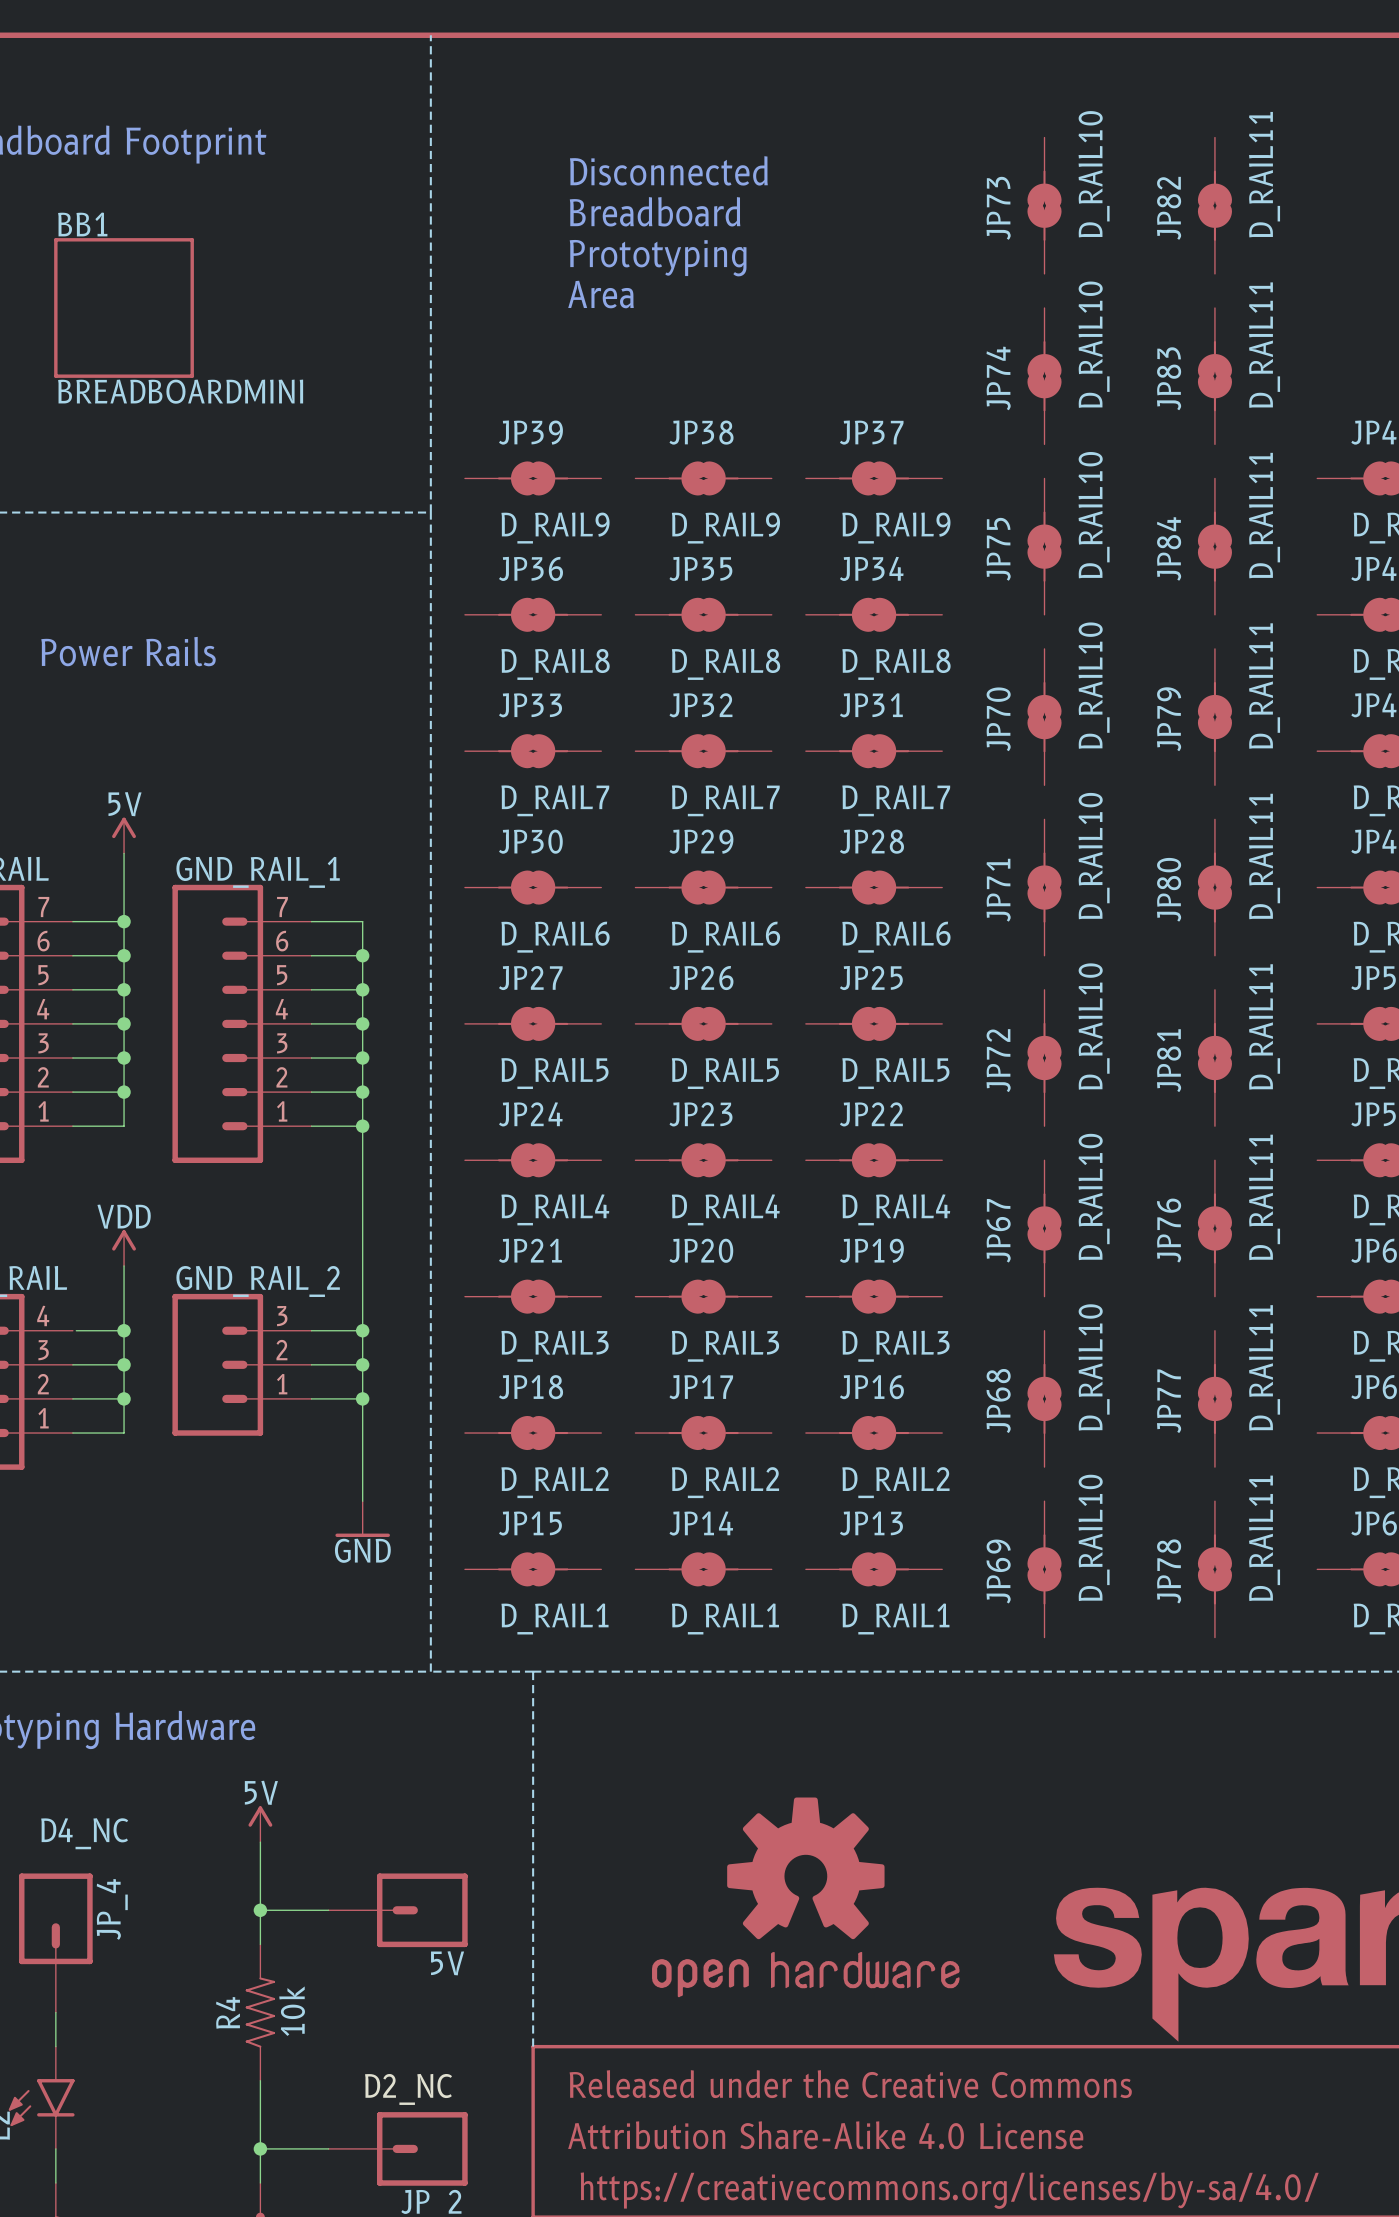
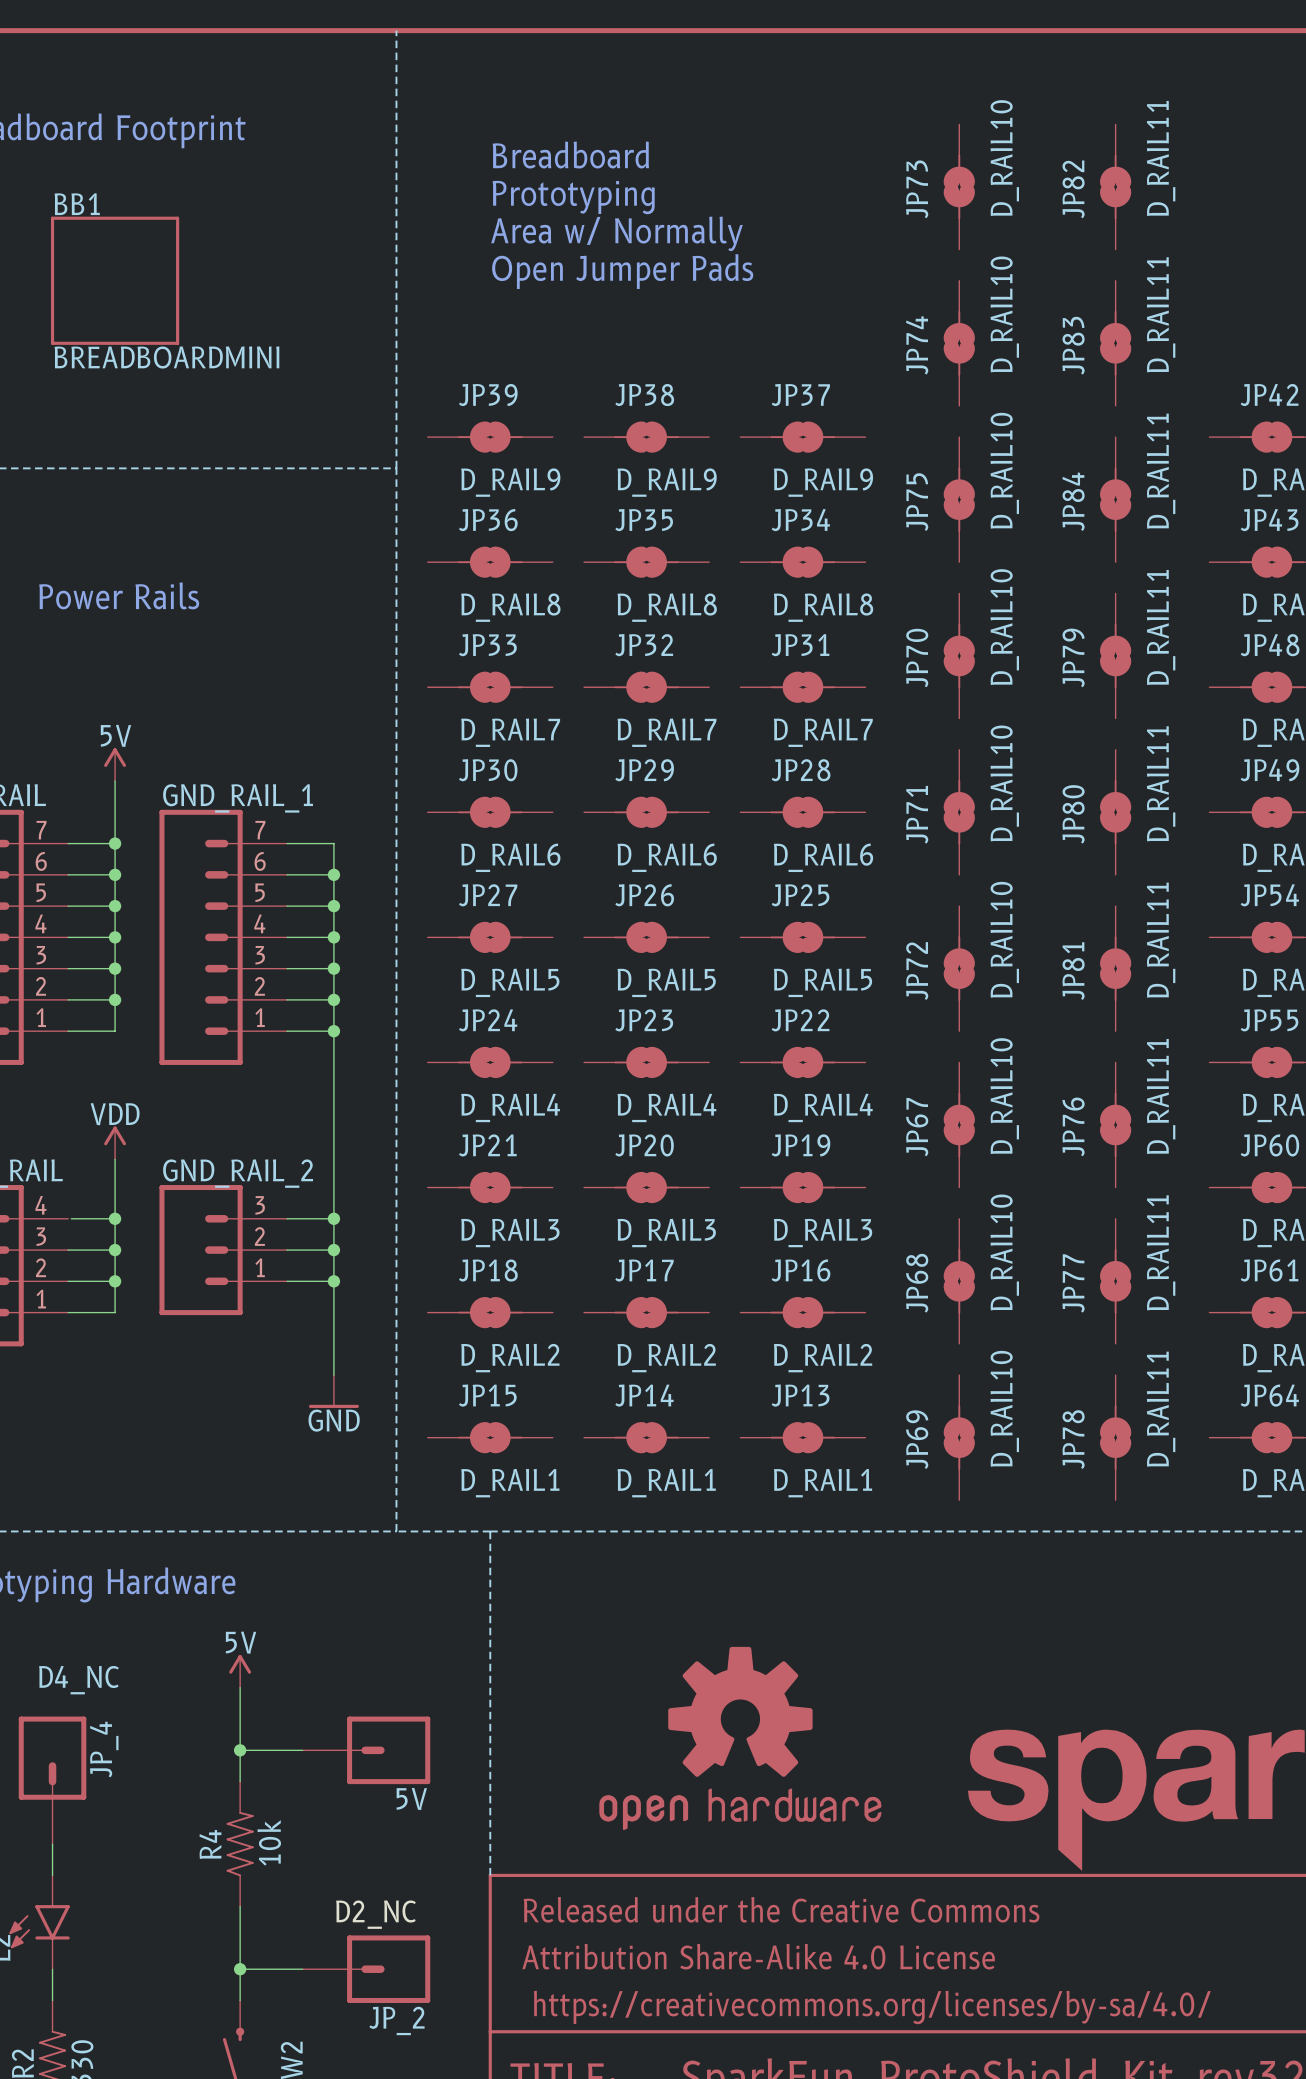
text: Disconnected (668, 170) -> none
text position: Breadboard (655, 211) -> Breadboard (570, 155)
text: none -> Area w/ Normally (617, 233)
text position: Prototyping (658, 258) -> Prototyping (573, 197)
text: Area (600, 294) -> none
text: none -> Open Jumper Pads (622, 271)

